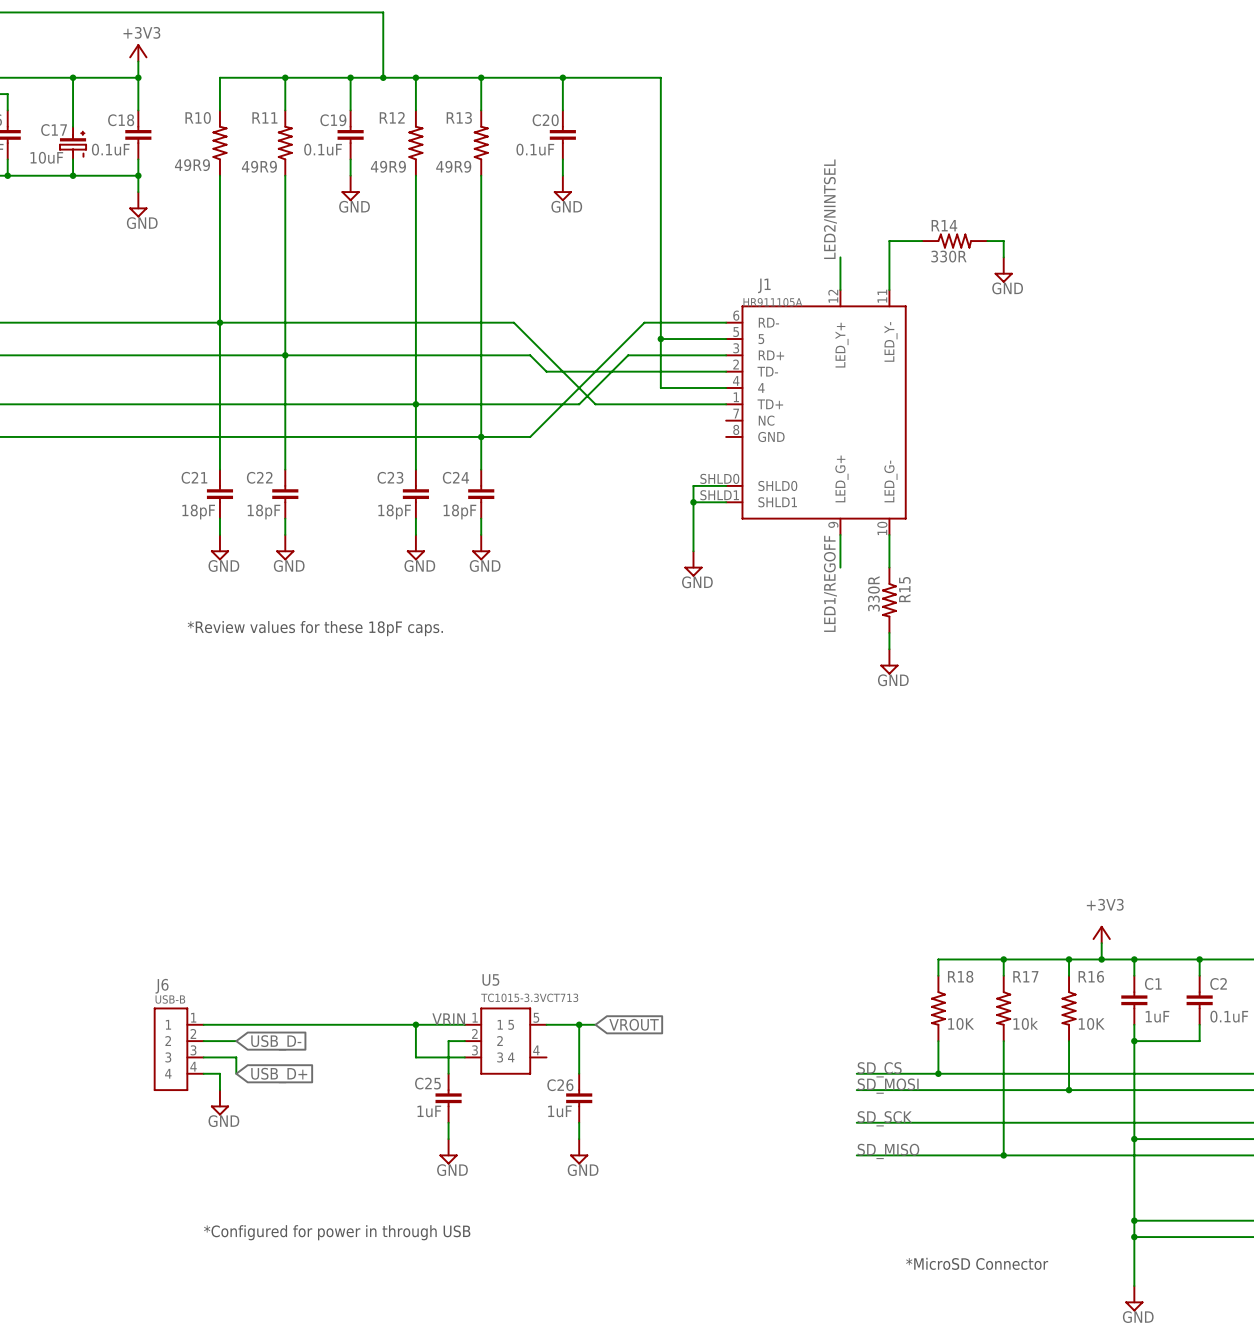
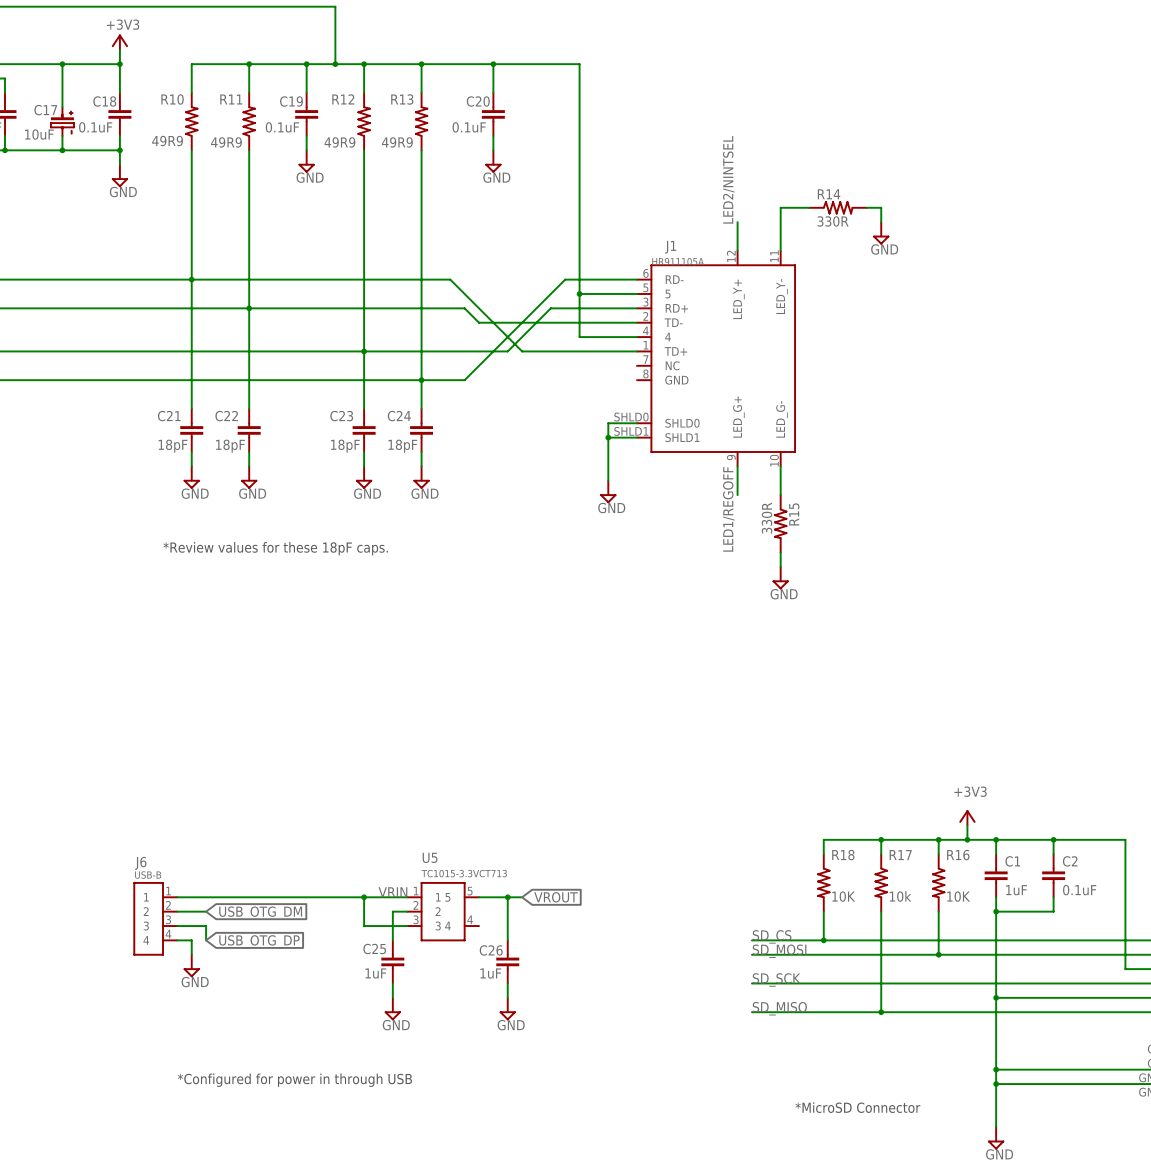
global label: USB_D- (276, 1042) -> USB_OTG_DM (260, 913)
global label: USB_D+ (279, 1075) -> USB_OTG_DP (259, 941)

